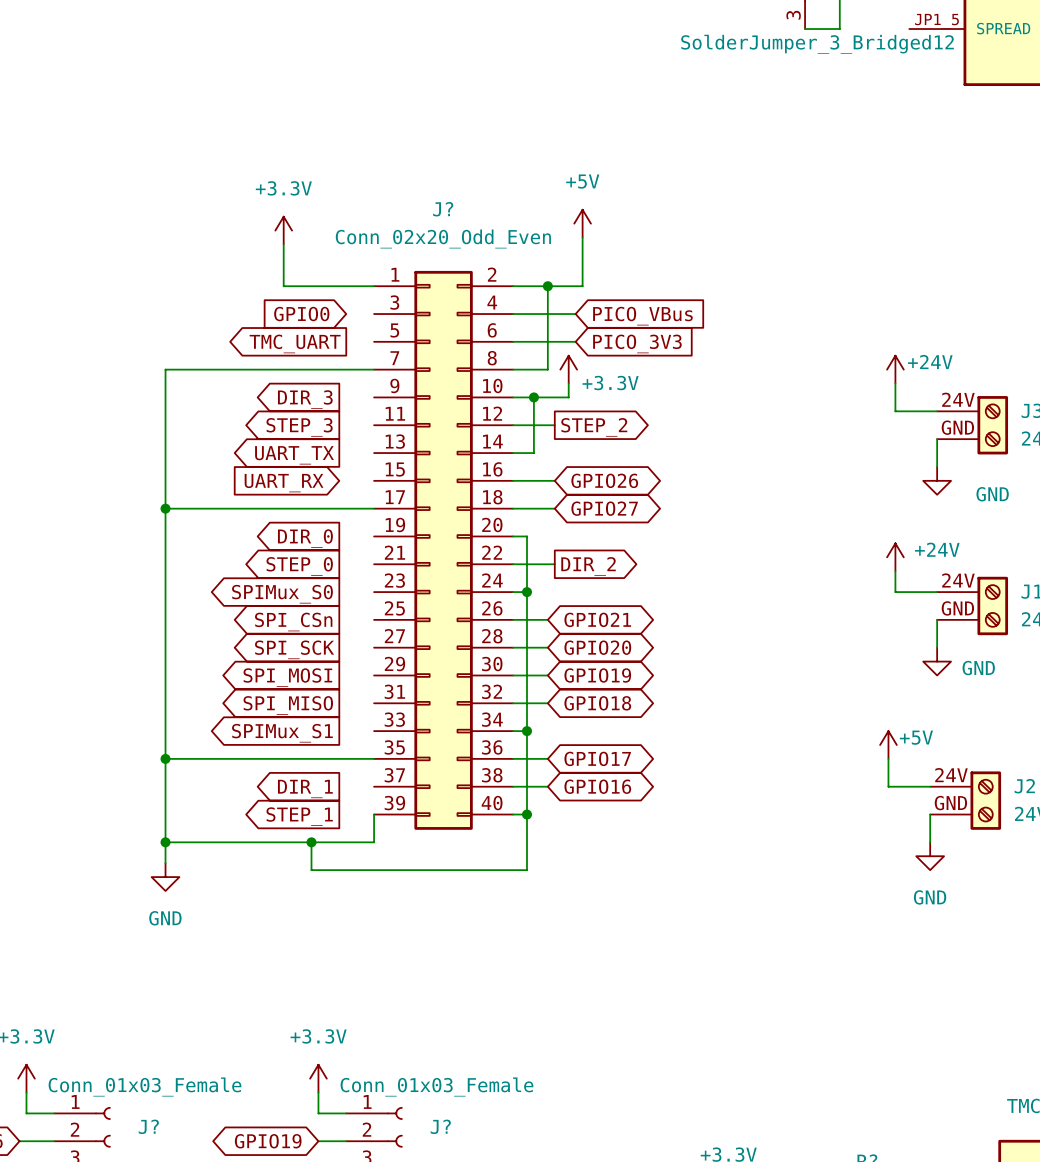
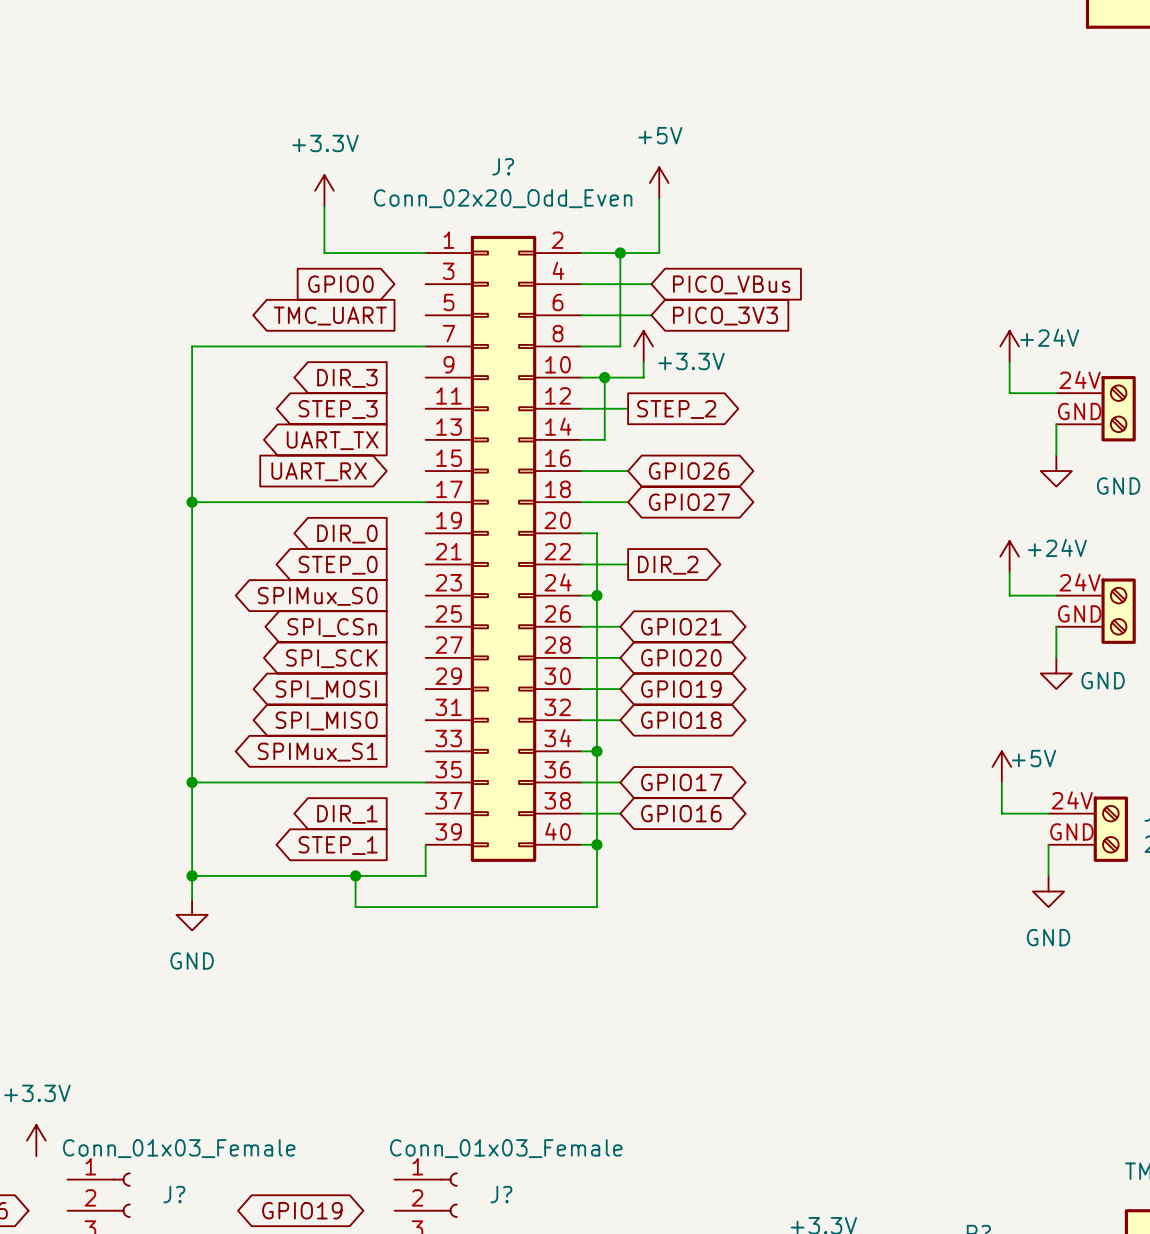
power symbol: +3.3V (318, 1078) -> none
wire: (26, 1092) (26, 1113) (54, 1113) -> none
wire: (318, 1092) (318, 1113) (346, 1113) -> none
wire: (19, 1141) (54, 1141) -> none
wire: (318, 1141) (346, 1141) -> none

